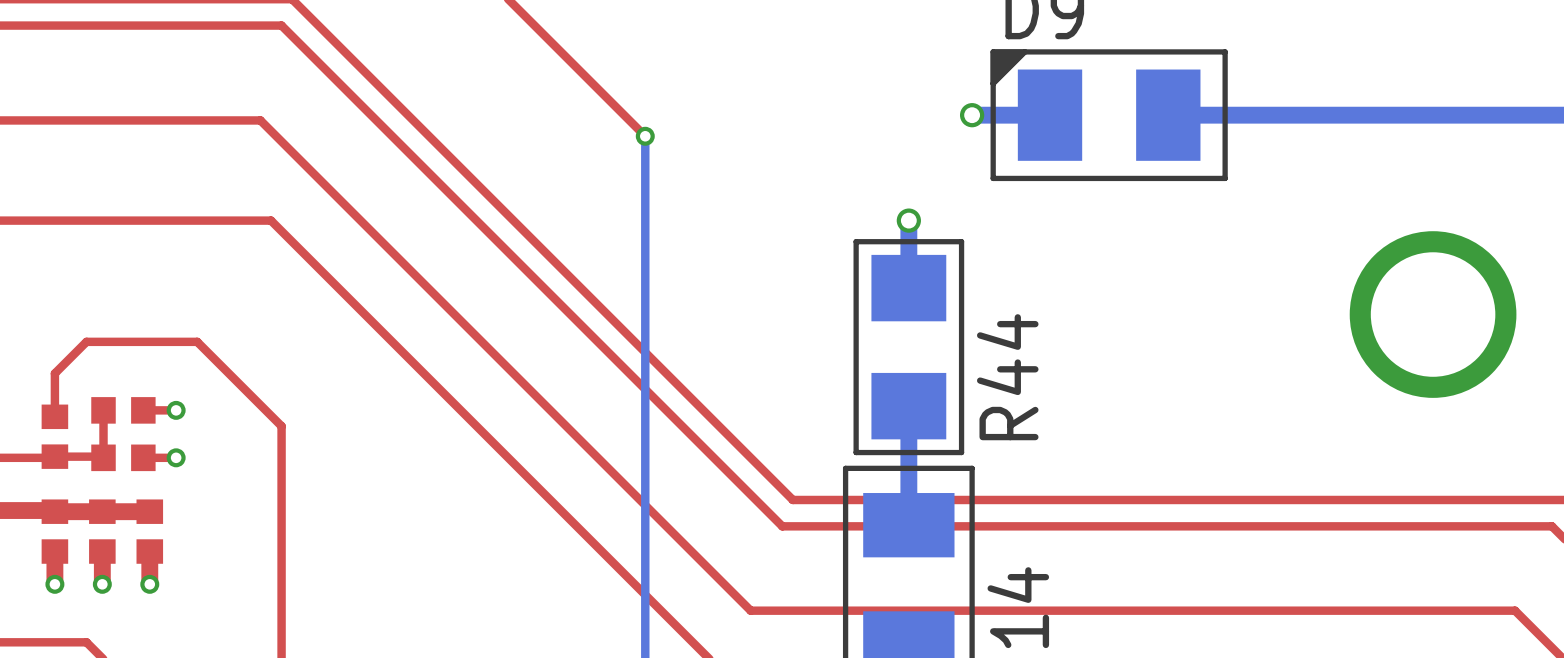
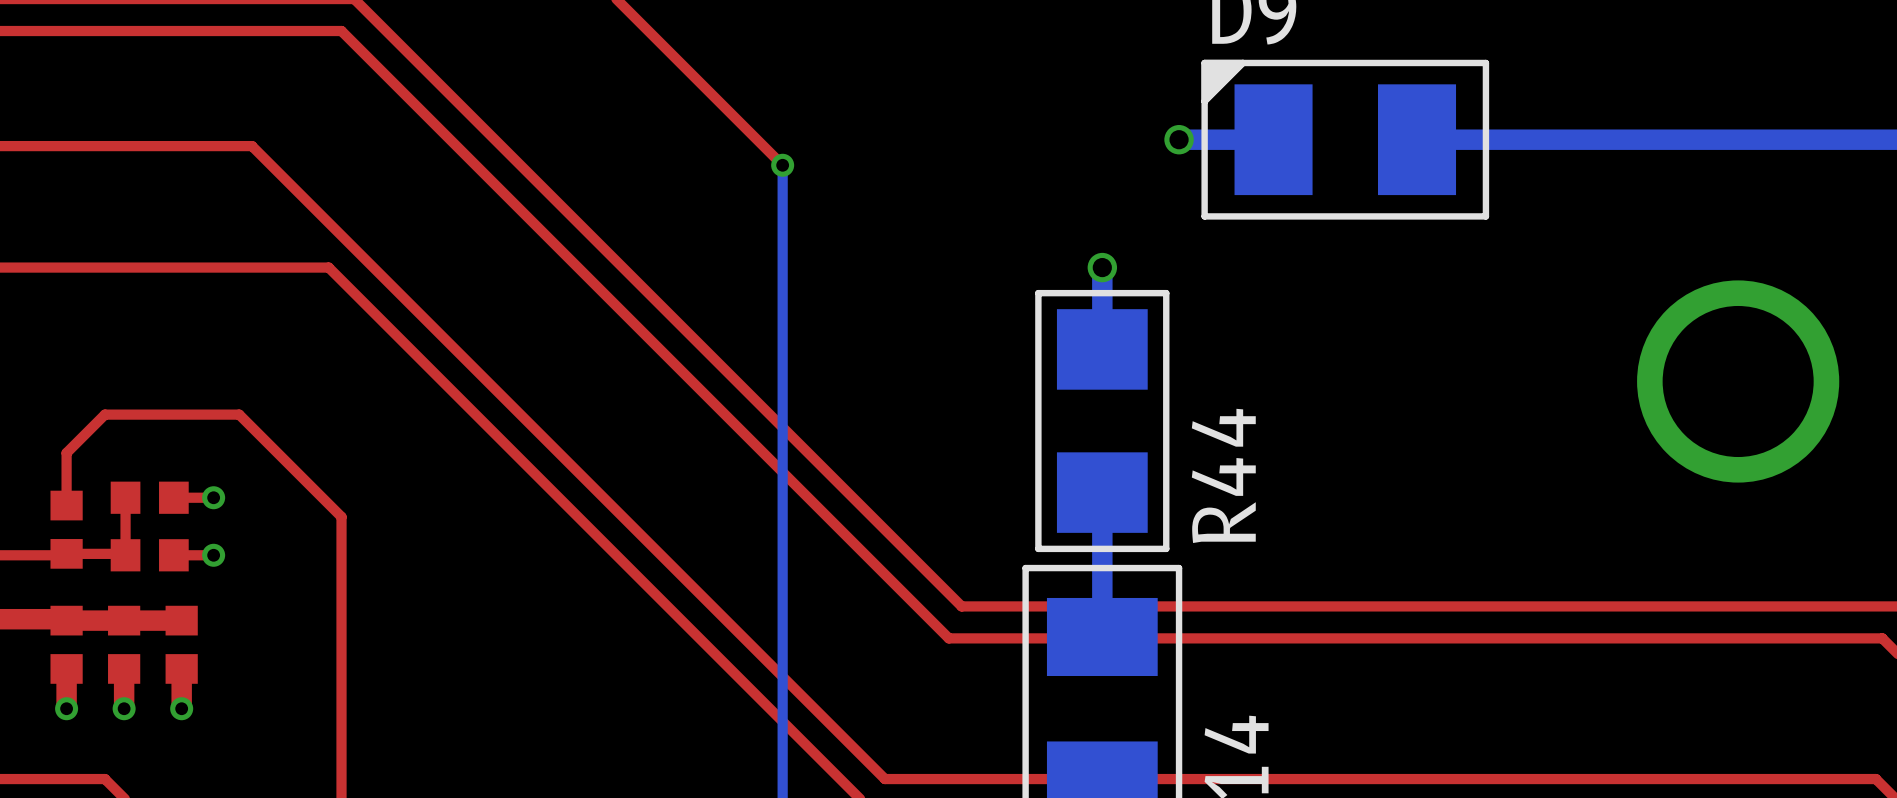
top track: (207, 120) (260, 120) (750, 610) (1515, 610) (1546, 642) -> (252, 146) (884, 779) (1875, 779)

